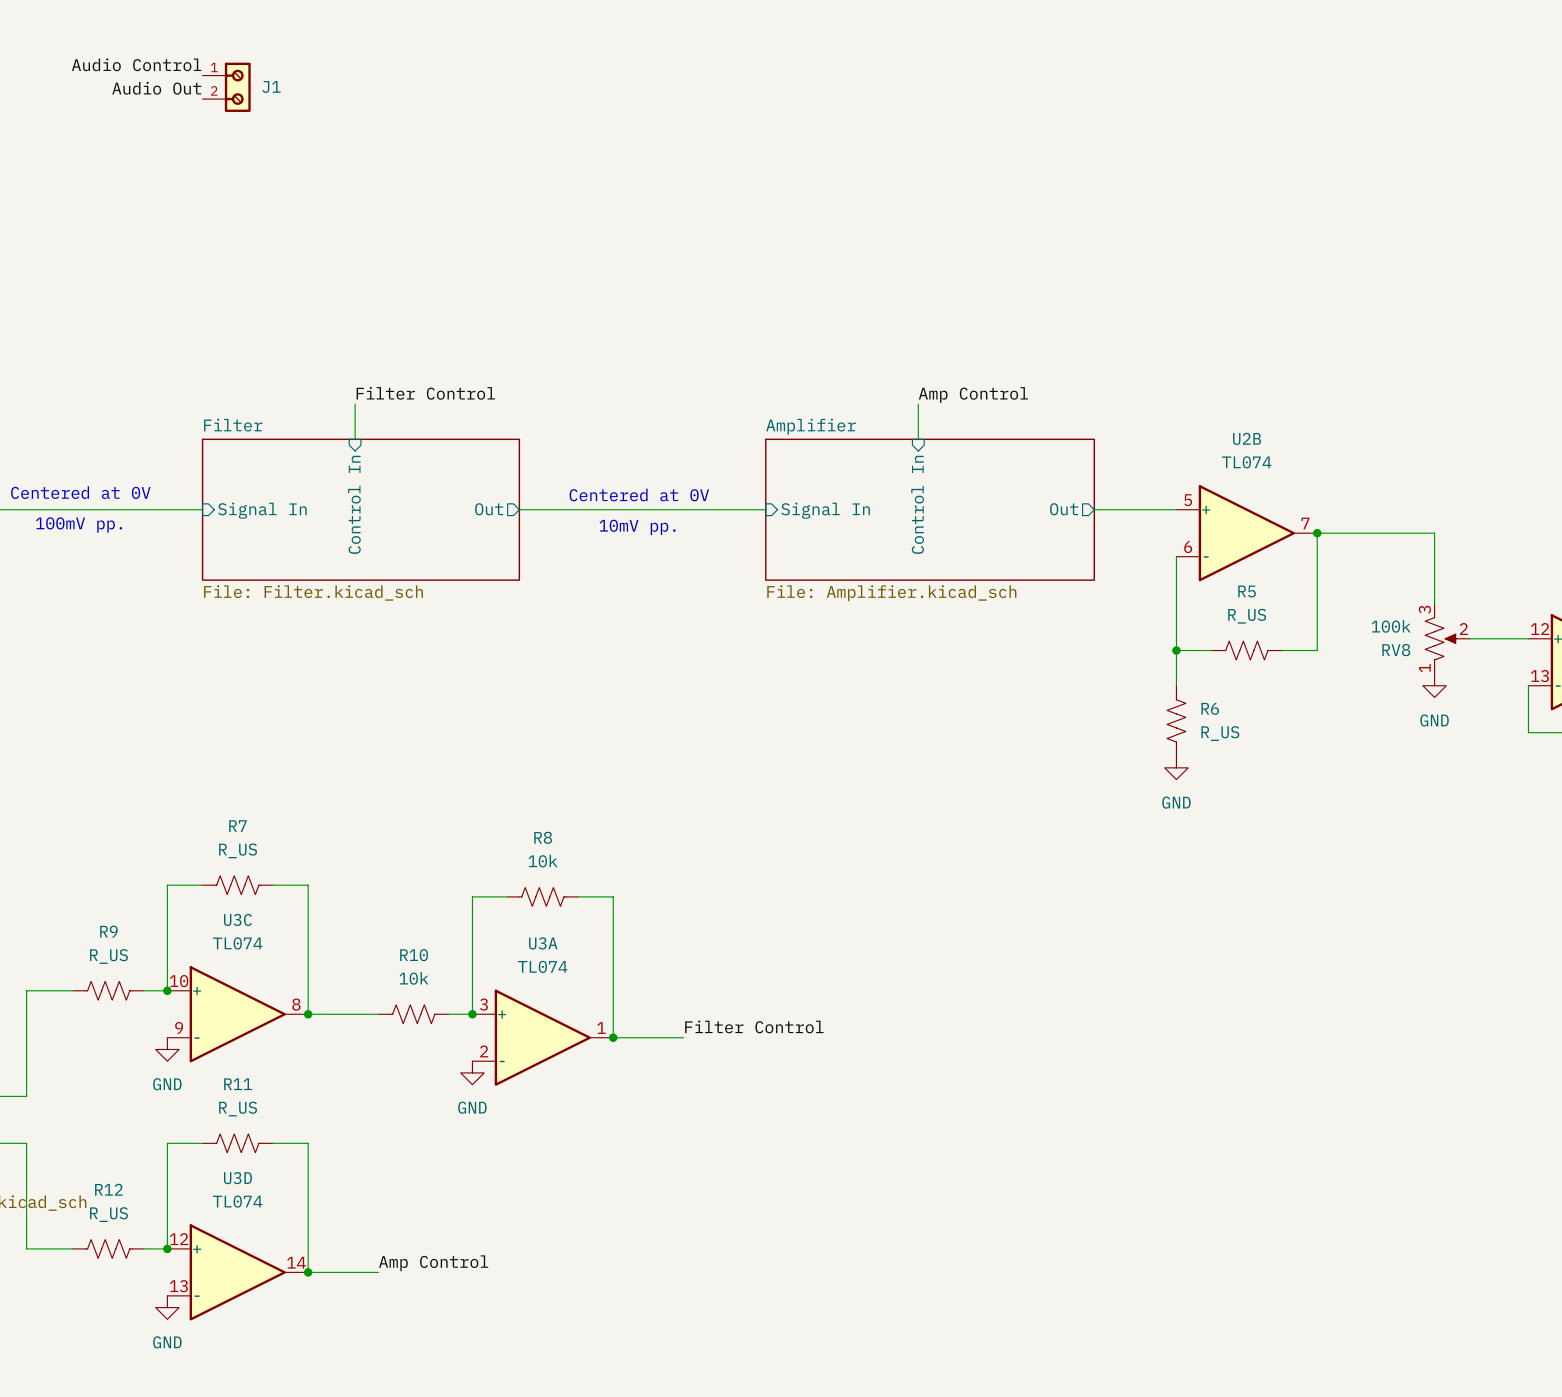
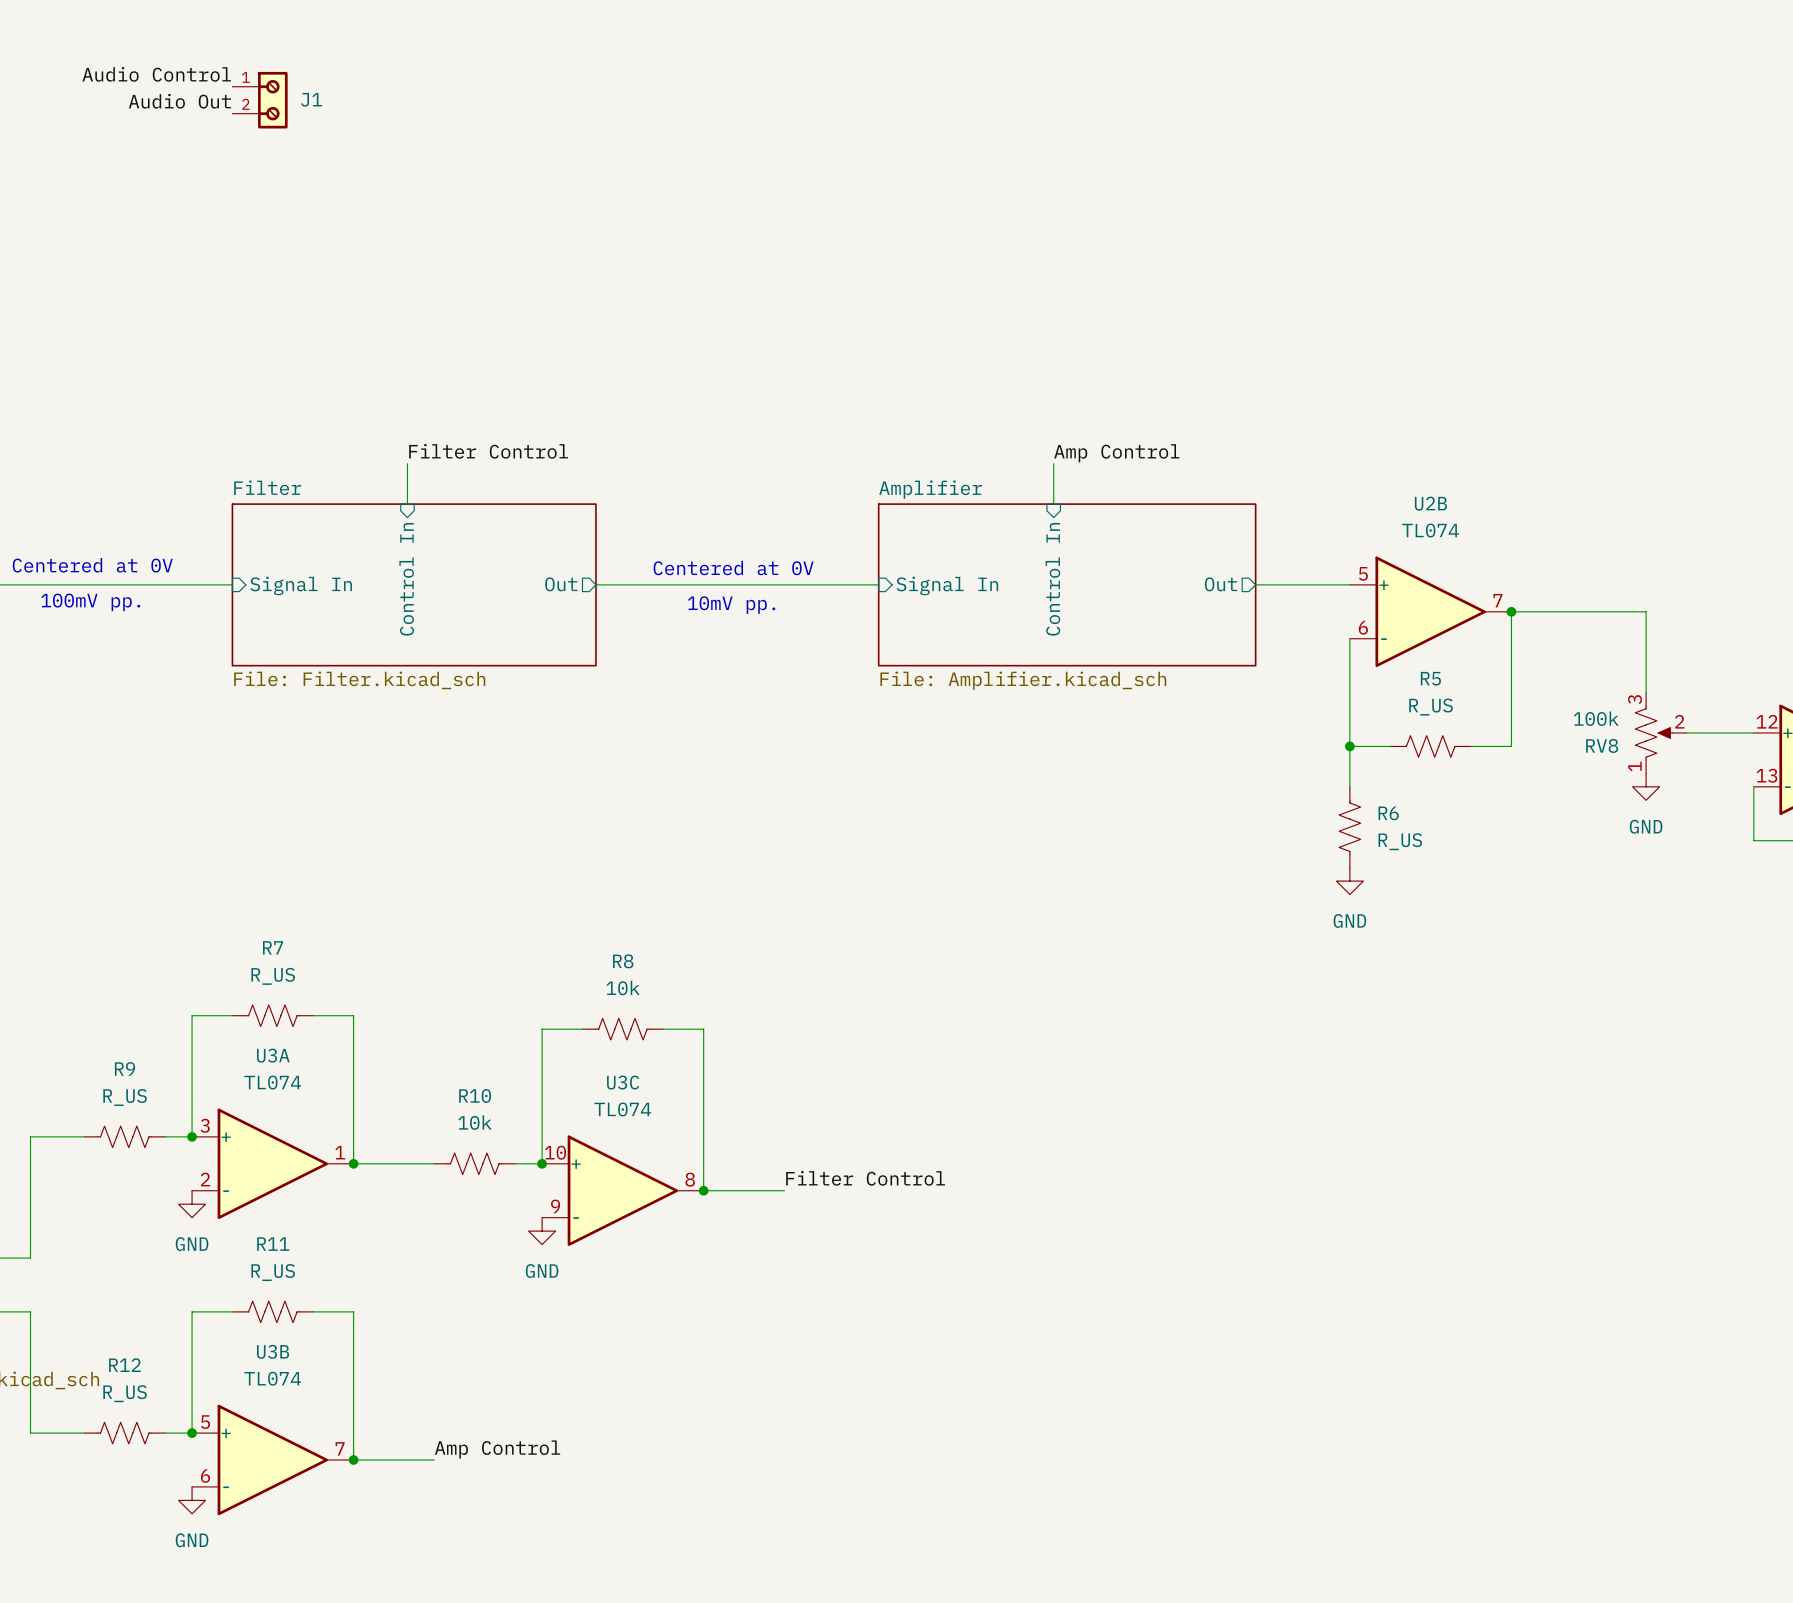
U3C position: (237, 1014) -> (622, 1190)
U3A position: (542, 1037) -> (272, 1163)
U3D name: U3D (237, 1178) -> U3B (273, 1351)
U3D pin number: 12 (179, 1239) -> 5 (205, 1422)
U3D pin number: 14 (296, 1262) -> 7 (340, 1448)
U3D pin number: 13 (178, 1286) -> 6 (205, 1475)

